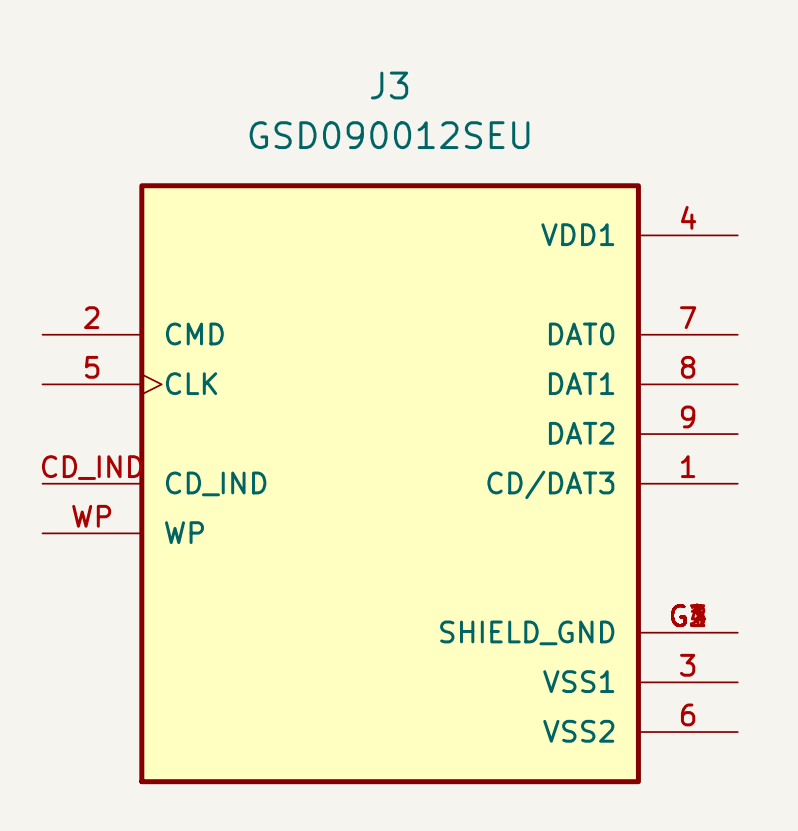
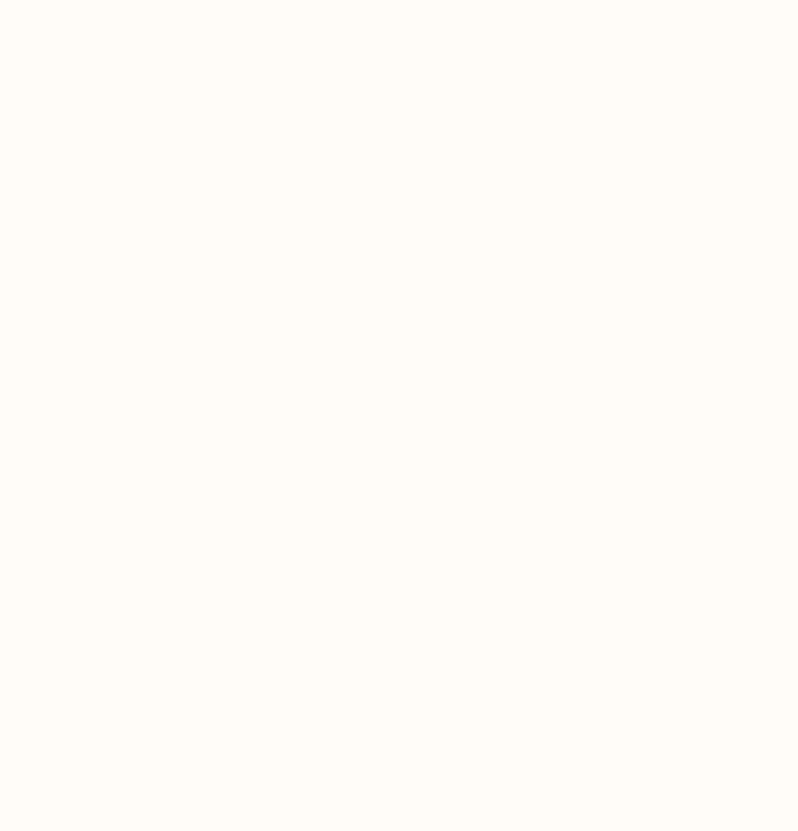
J3: GSD090012SEU (390, 483) -> none

